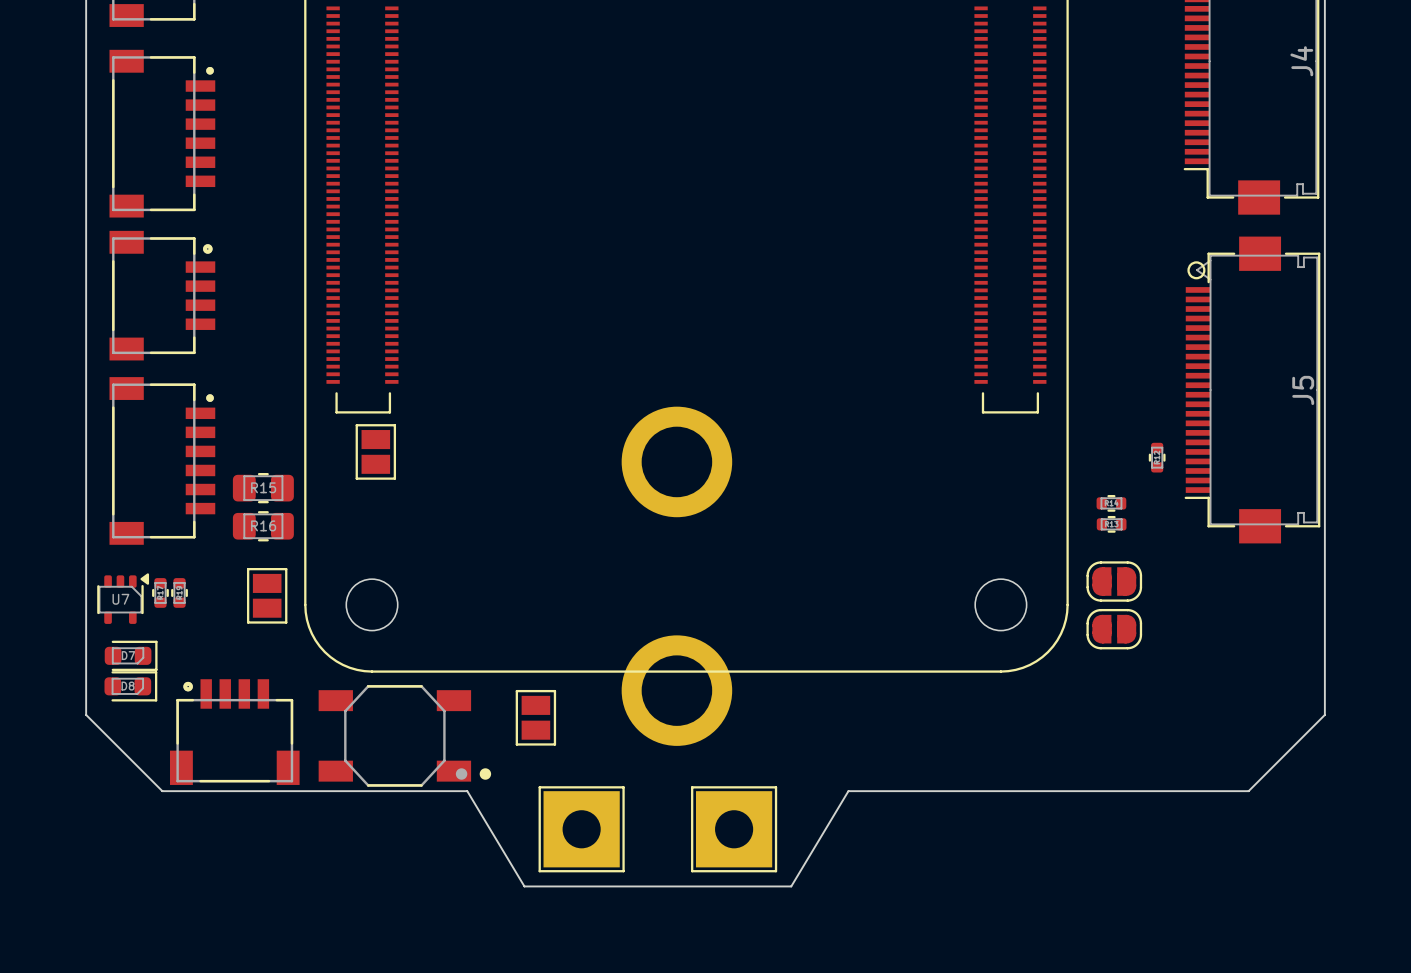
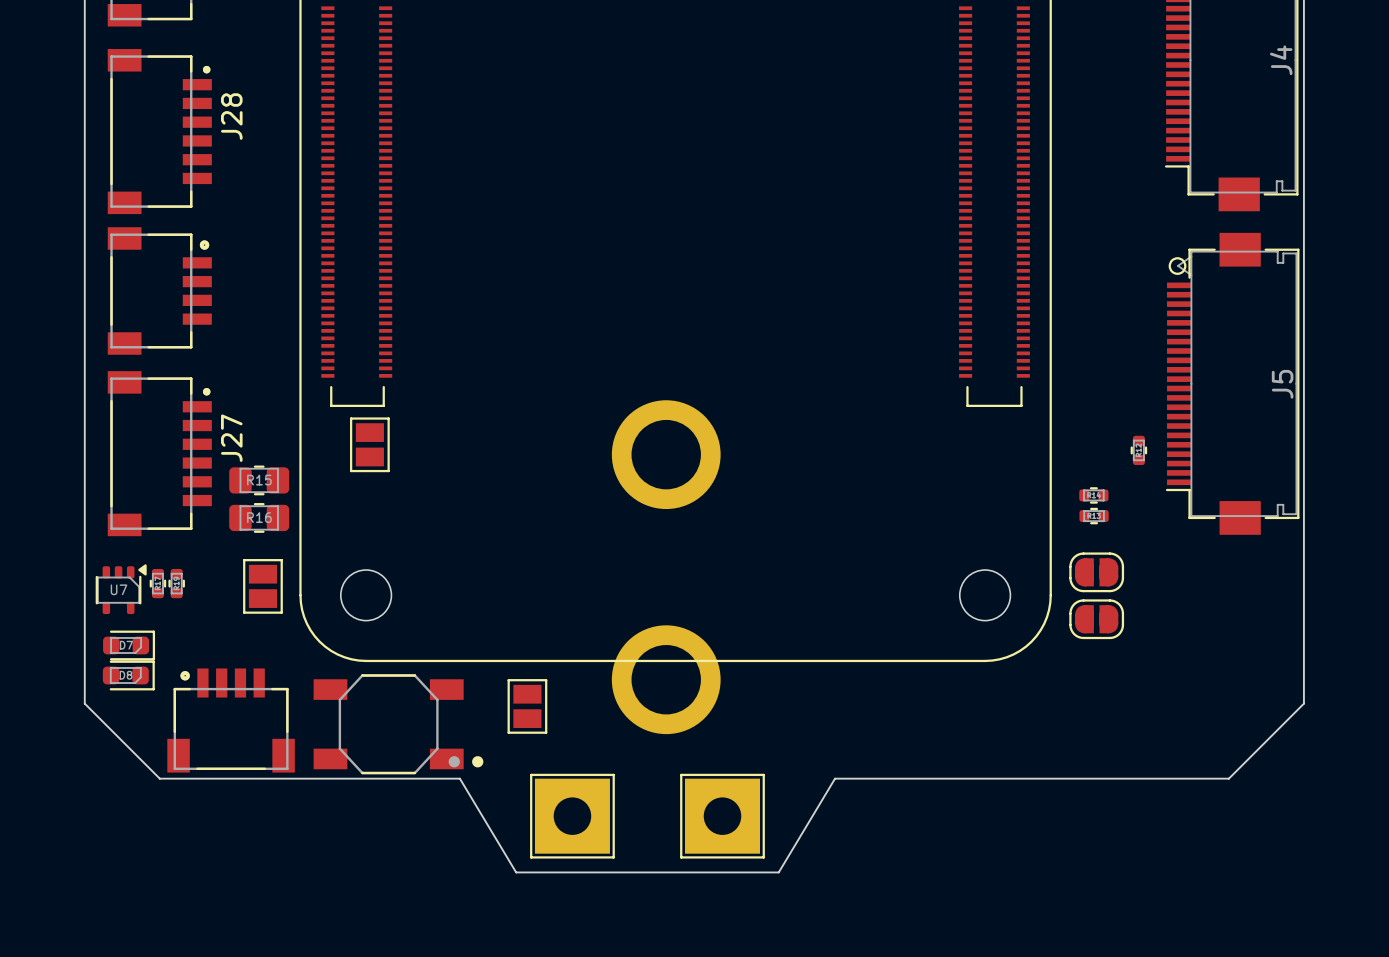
J28 name: none -> J28 (231, 116)
J27 name: none -> J27 (231, 438)

